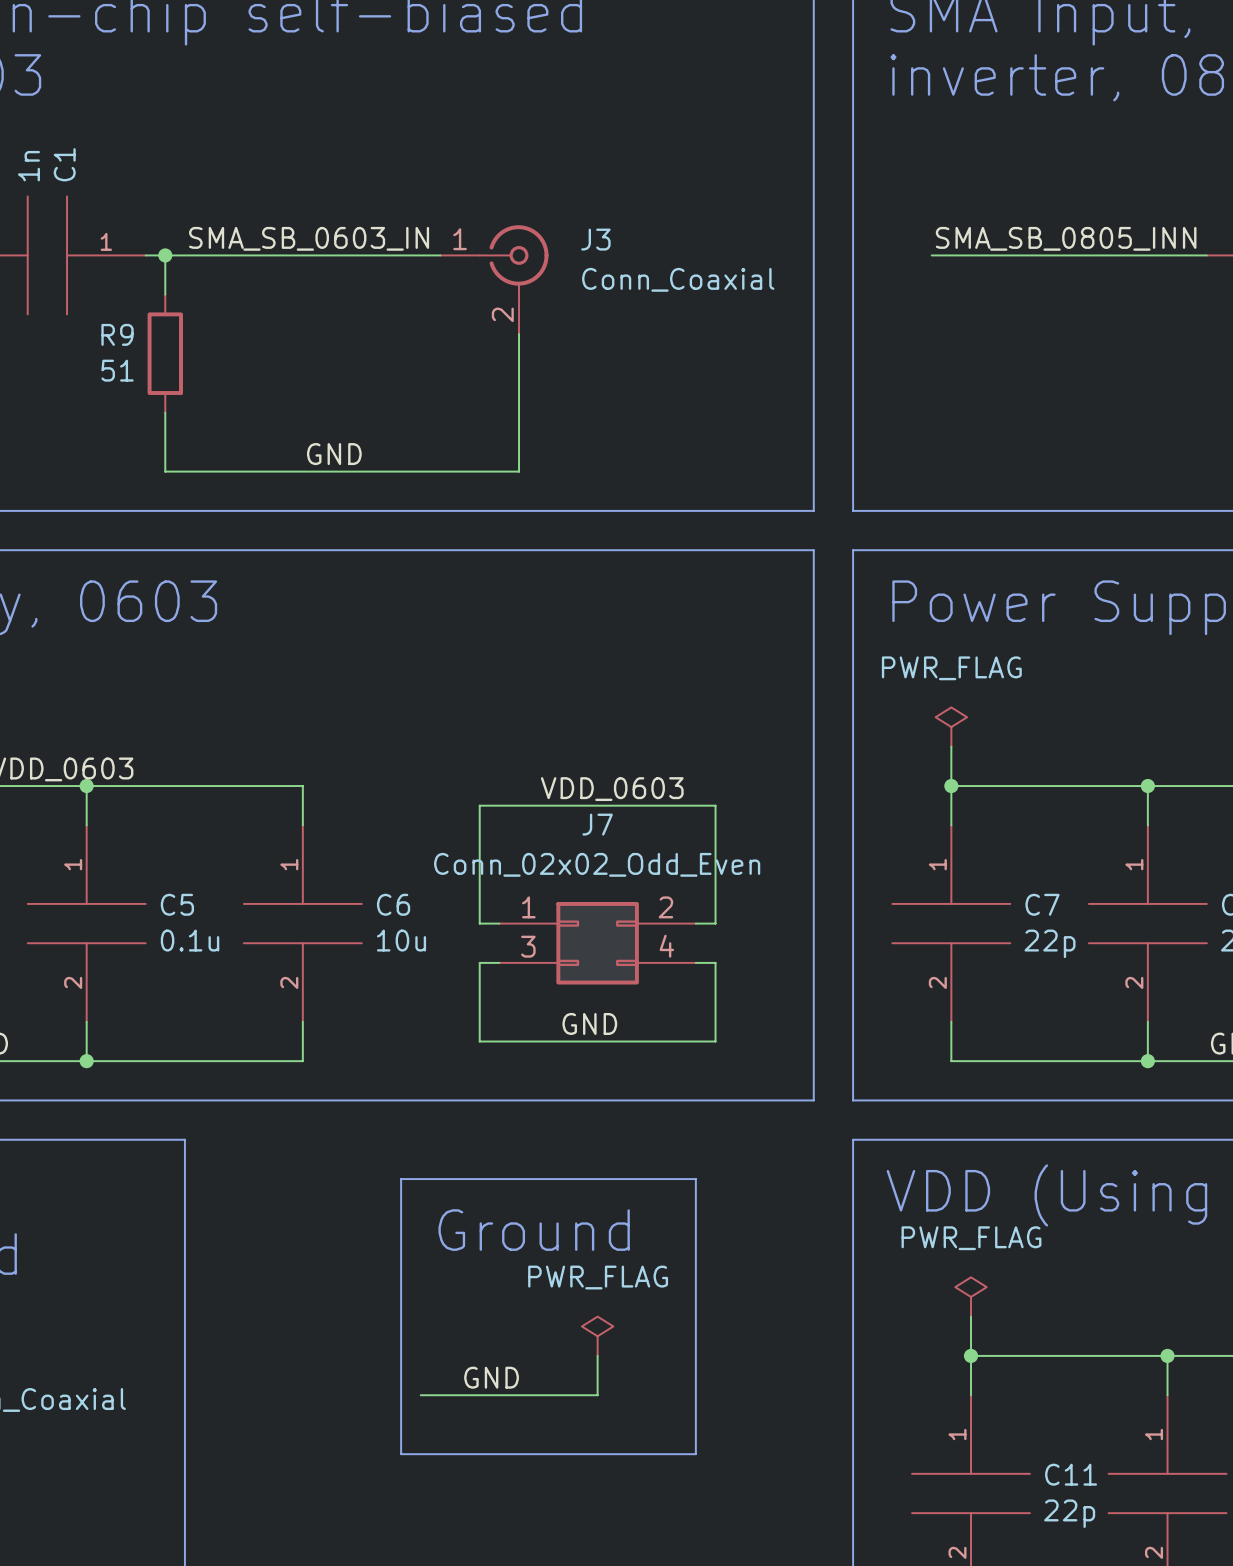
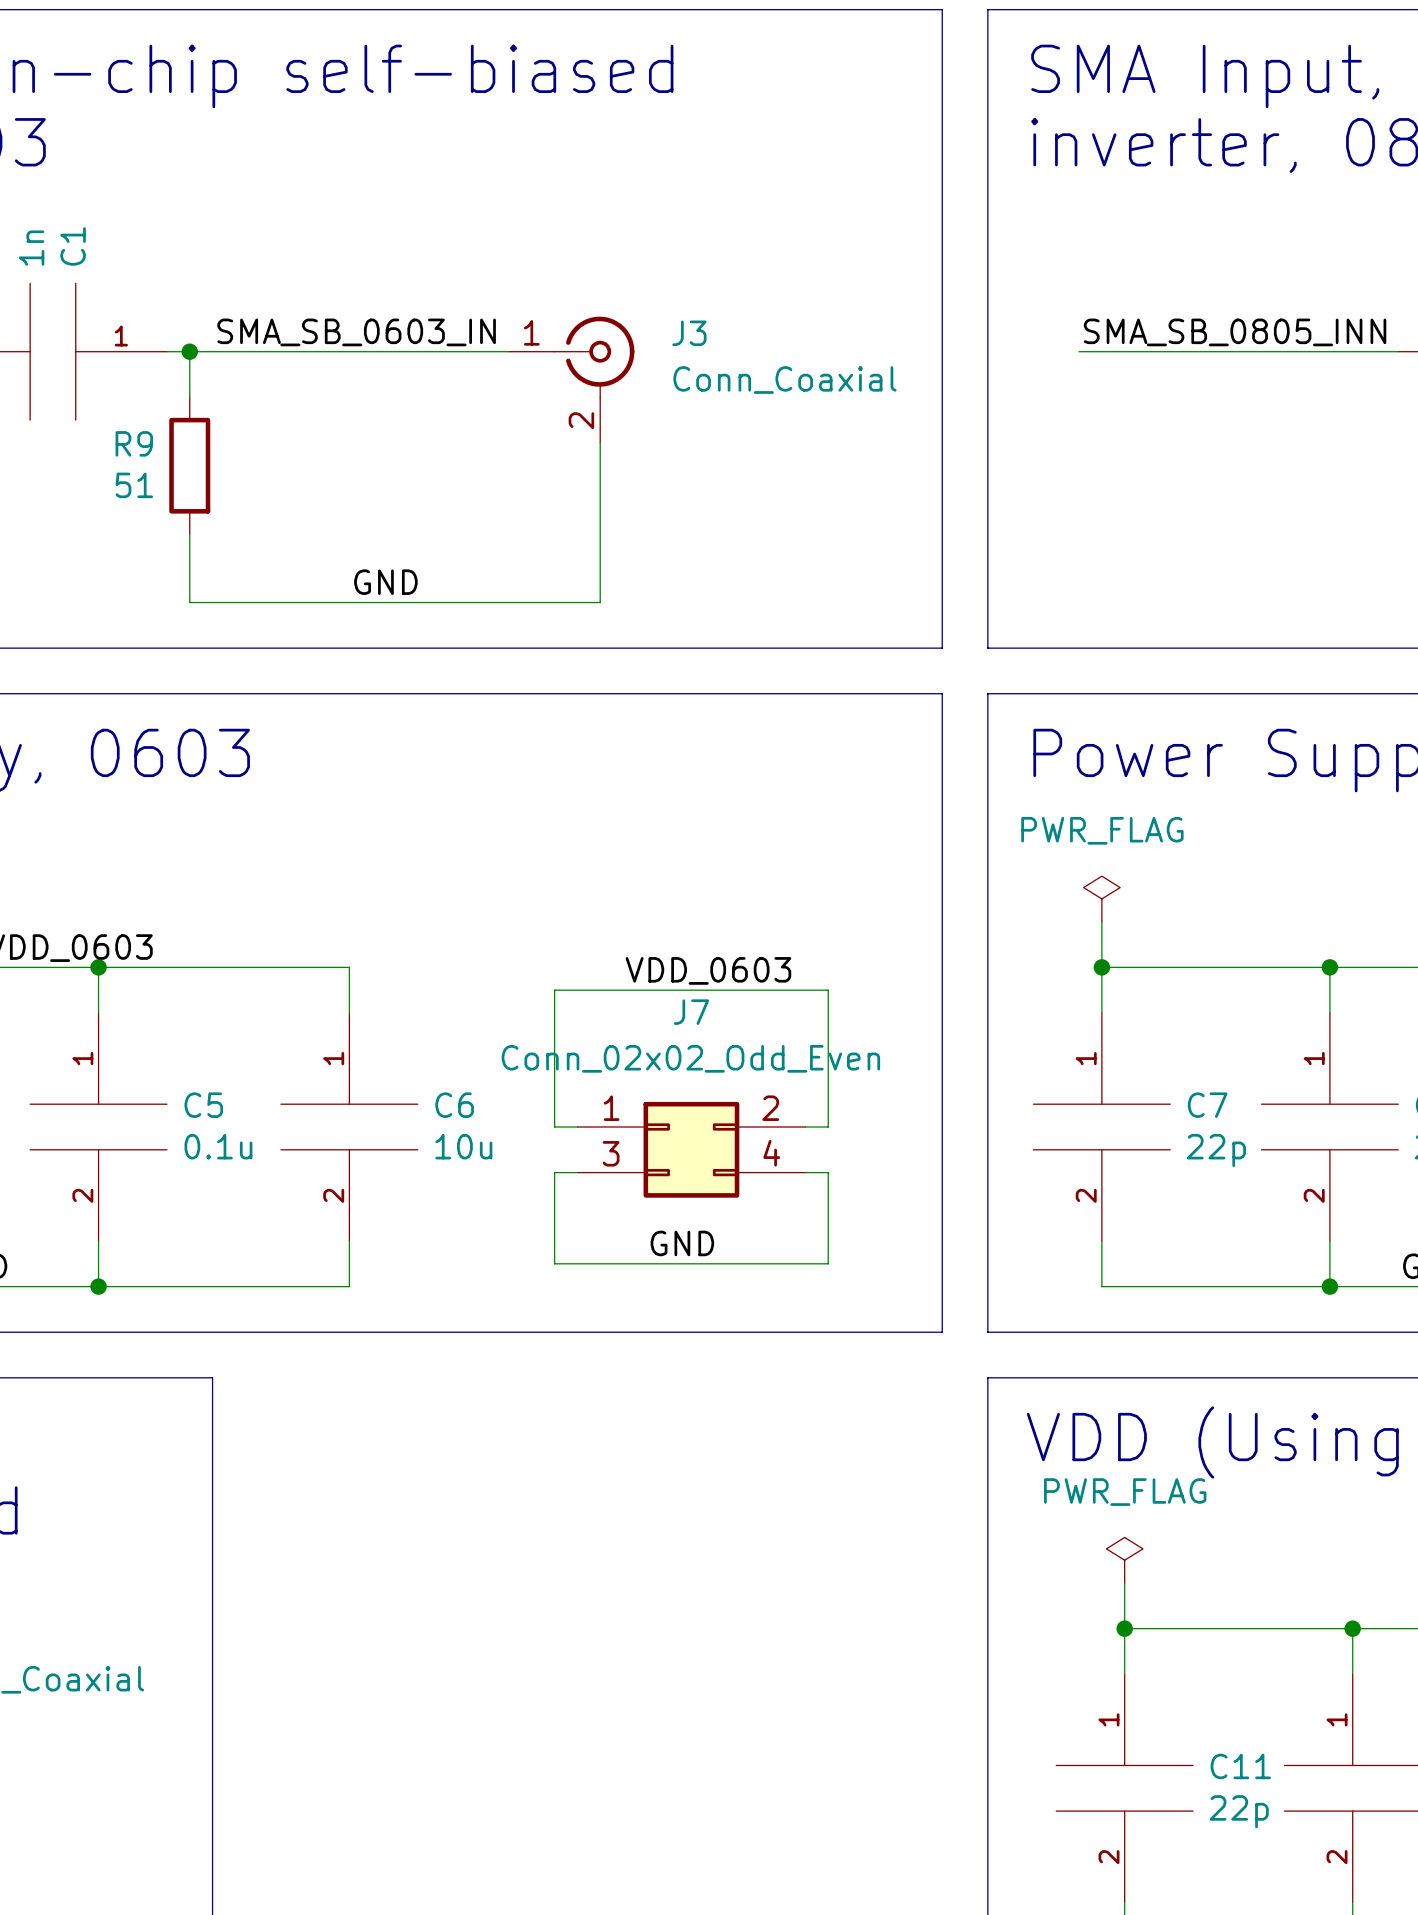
line: (401, 1179) (695, 1179) (695, 1454) (401, 1454) (401, 1179) -> none
text: Ground (534, 1230) -> none
power symbol: PWR_FLAG (597, 1336) -> none
wire: (597, 1355) (597, 1395) (420, 1395) -> none
label: GND (491, 1377) -> none

